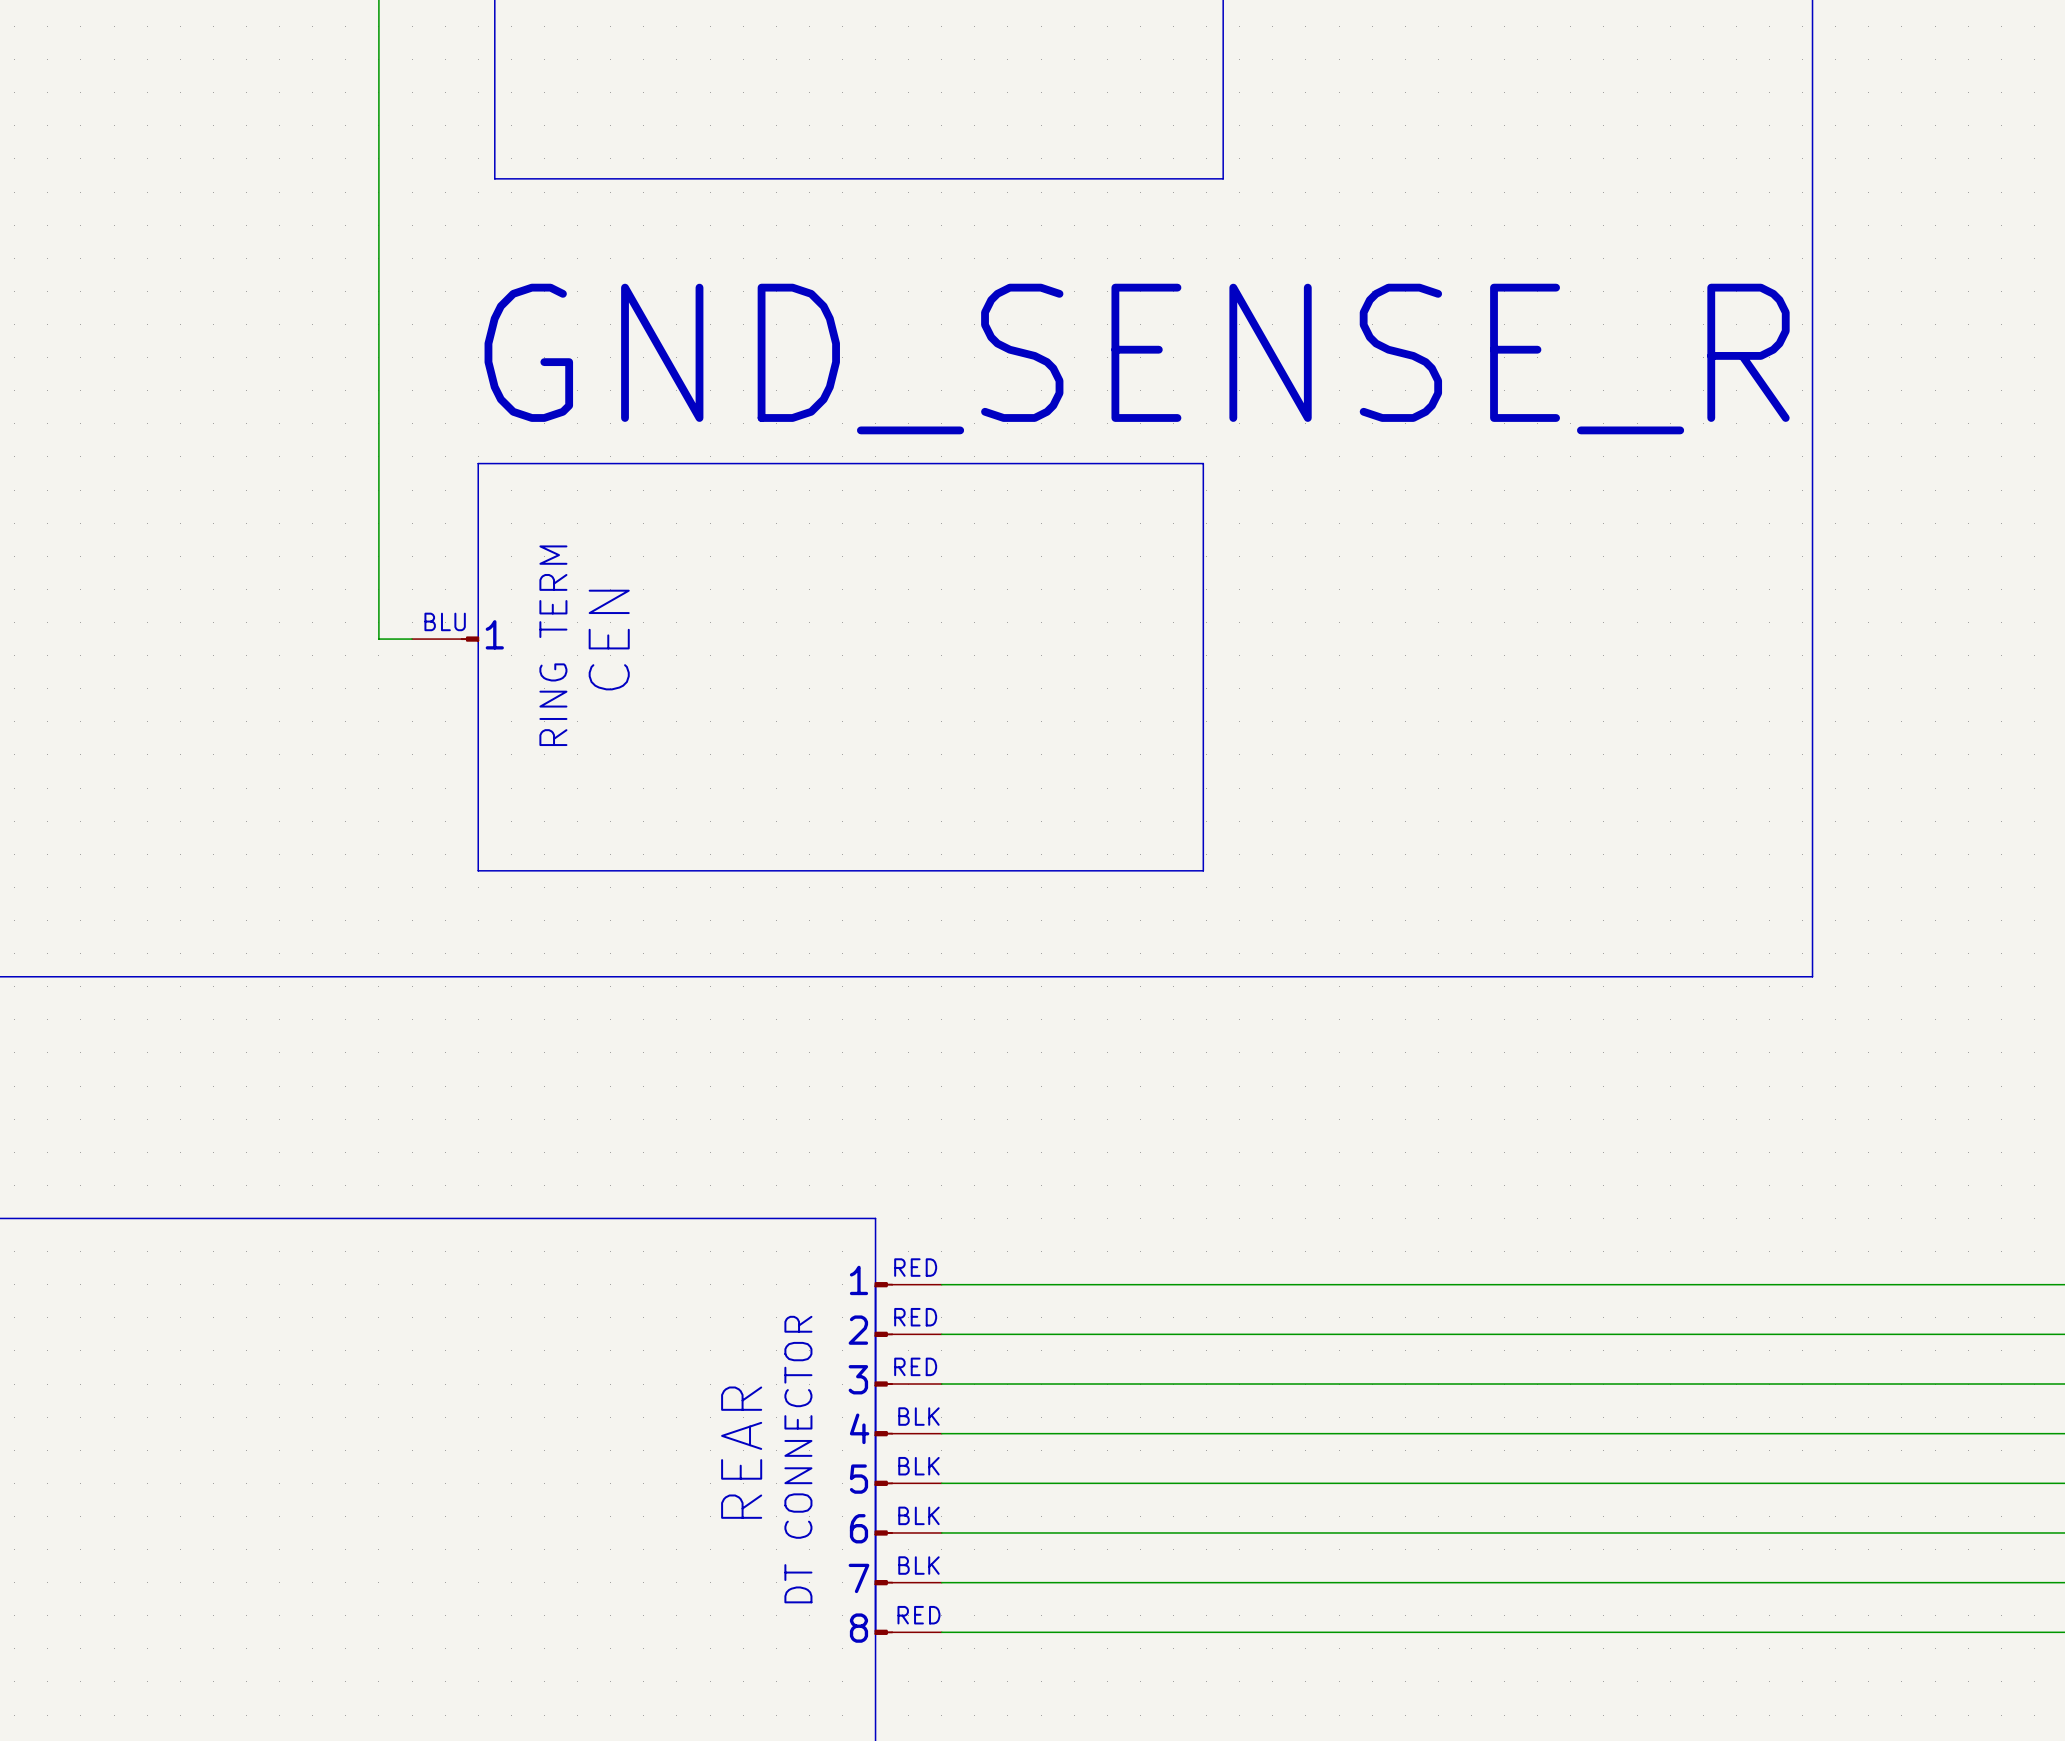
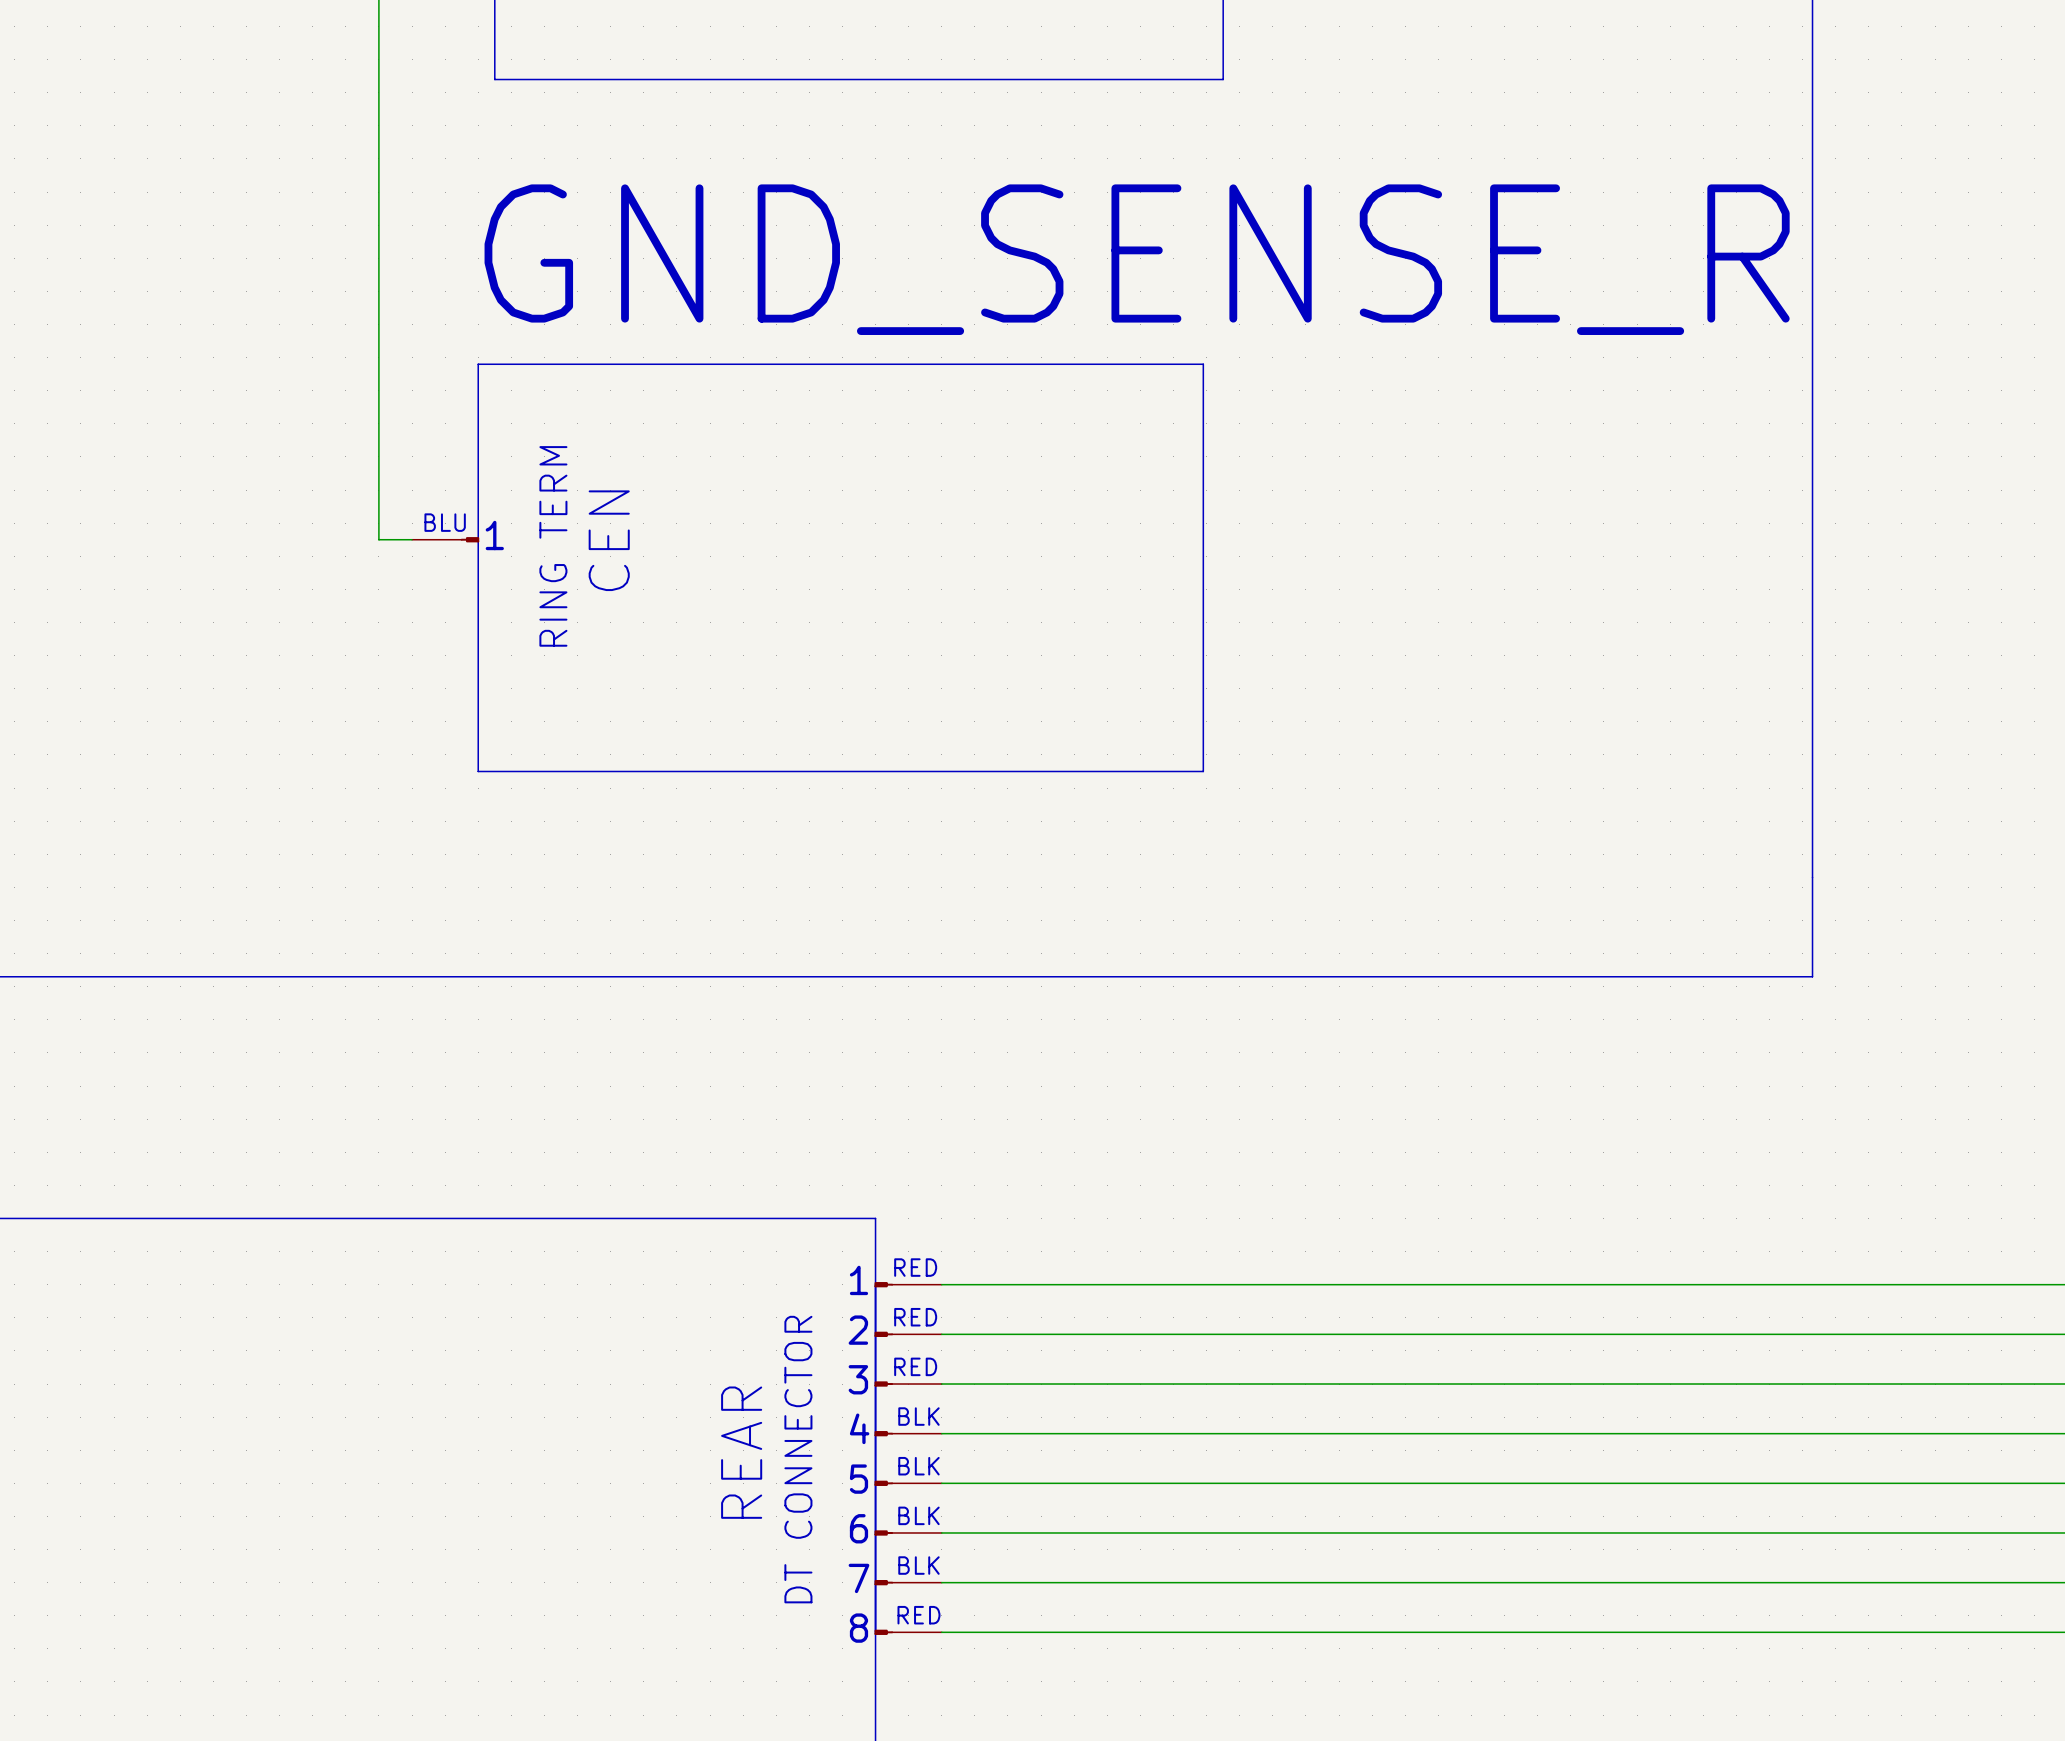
line: (494, 79) (494, 178) (1223, 178) (1223, 79) -> (494, 79) (1223, 79)
text position: GND_SENSE_R (1137, 359) -> GND_SENSE_R (1137, 259)
line: (478, 463) (1203, 463) -> (478, 463) (478, 364) (1203, 364) (1203, 463)
wire: (378, 539) (378, 639) (412, 639) -> (378, 539) (412, 539)
text position: BLU (445, 621) -> BLU (445, 522)
text position: 1 (494, 634) -> 1 (494, 535)
part position: (445, 639) -> (445, 539)
text position: CEN (609, 640) -> CEN (609, 540)
text position: RING TERM (553, 645) -> RING TERM (553, 546)
line: (478, 771) (478, 870) (1203, 870) (1203, 771) -> (478, 771) (1203, 771)

